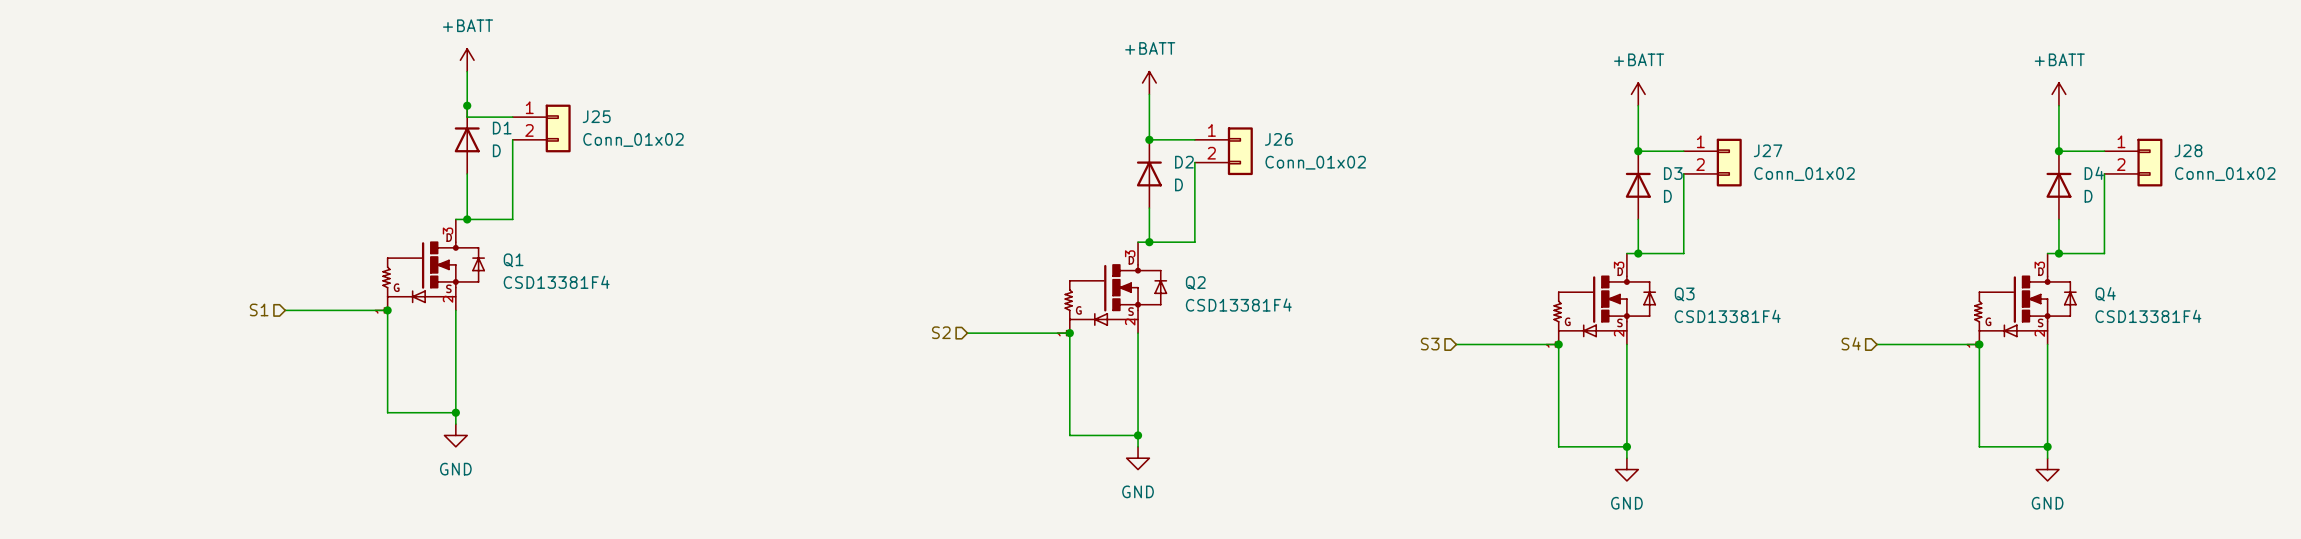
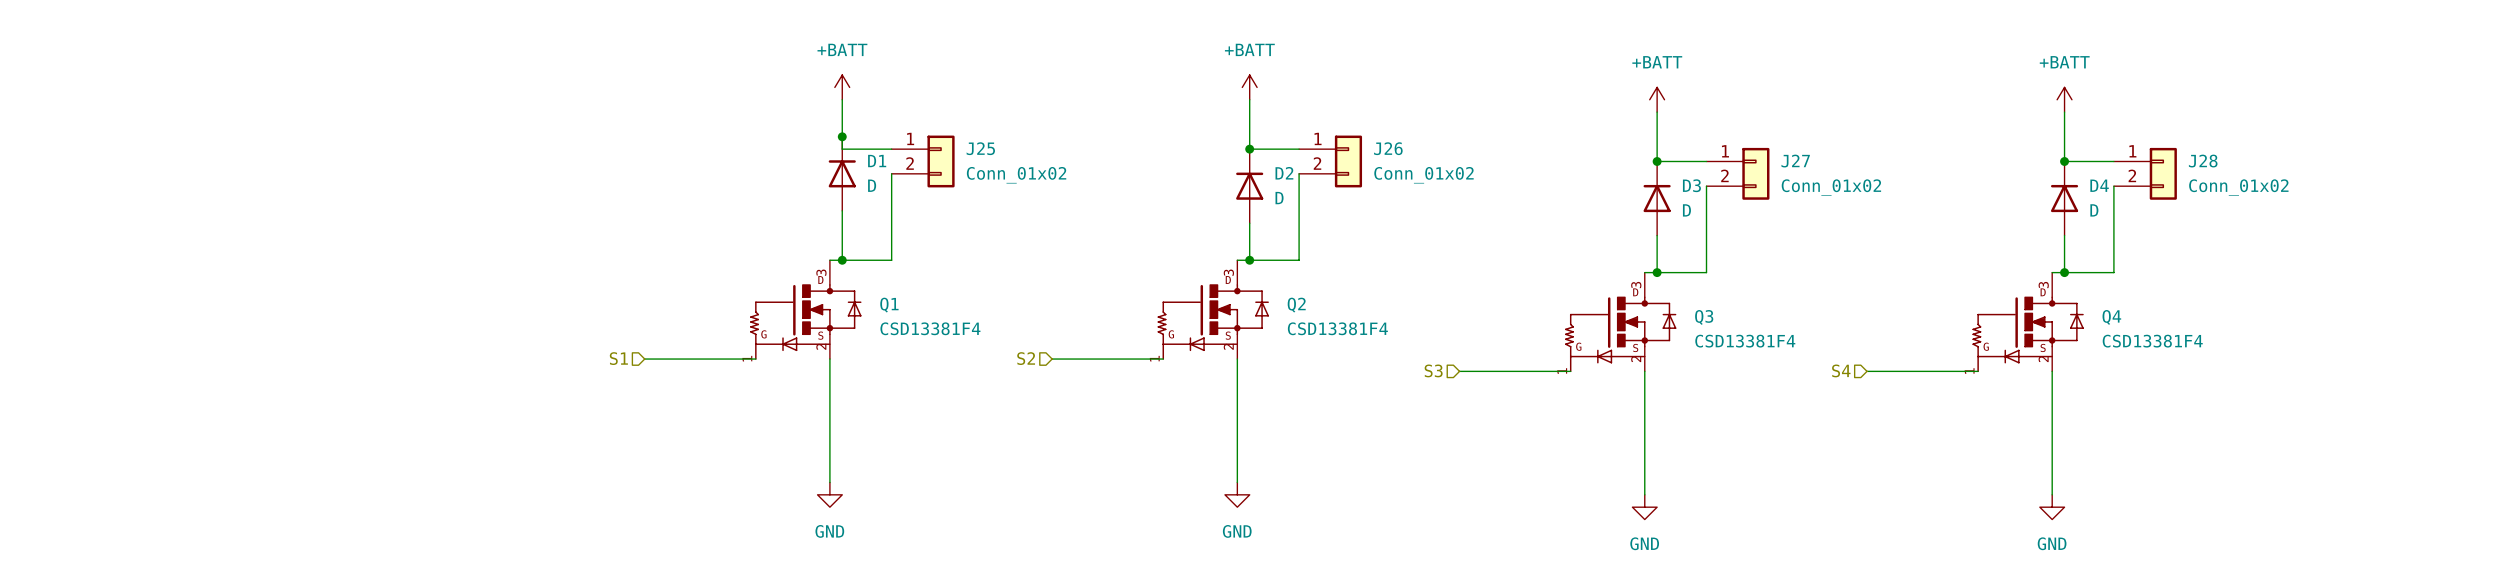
power symbol: +BATT (467, 60) -> none
wire: (467, 71) (467, 117) (512, 117) -> none
power symbol: none -> +BATT (842, 87)
wire: none -> (842, 99) (842, 149) (891, 149)
power symbol position: +BATT (1638, 94) -> +BATT (1657, 99)
power symbol: none -> +BATT (2064, 99)
power symbol: +BATT (2058, 94) -> none
junction: (467, 105) -> none
wire: (1638, 105) (1638, 151) (1683, 151) -> (1657, 112) (1657, 161) (1706, 161)
wire: (2058, 105) (2058, 151) (2104, 151) -> (2064, 112) (2064, 161) (2113, 161)
J25 position: (541, 128) -> (923, 161)
junction: none -> (842, 136)
D1 position: (467, 139) -> (842, 173)
wire: (512, 139) (512, 219) (455, 219) -> none
junction: none -> (1657, 161)
junction: (1638, 151) -> none
junction: none -> (2064, 161)
junction: (2058, 151) -> none
wire: none -> (891, 173) (891, 260) (829, 260)
J27 position: (1712, 162) -> (1737, 173)
J28 position: (2133, 162) -> (2145, 173)
wire: (467, 173) (467, 219) -> none
wire: (1683, 173) (1683, 253) (1626, 253) -> (1706, 186) (1706, 272) (1644, 272)
wire: (2104, 173) (2104, 253) (2047, 253) -> (2113, 186) (2113, 272) (2052, 272)
D3 position: (1638, 185) -> (1657, 198)
D4 position: (2058, 185) -> (2064, 198)
wire: none -> (842, 210) (842, 260)
junction: (467, 219) -> none
wire: (1638, 219) (1638, 253) -> (1657, 235) (1657, 272)
wire: (2058, 219) (2058, 253) -> (2064, 235) (2064, 272)
junction: none -> (842, 260)
junction: none -> (1657, 272)
junction: (1638, 253) -> none
junction: none -> (2064, 272)
junction: (2058, 253) -> none
Q1 position: (433, 265) -> (805, 310)
Q3 position: (1604, 299) -> (1620, 322)
Q4 position: (2025, 299) -> (2028, 322)
hierarchical label: S1 (259, 309) -> none
wire: (285, 310) (387, 310) (387, 412) (455, 412) -> none
junction: (387, 310) -> none
wire: (455, 310) (455, 424) -> none
hierarchical label: none -> S1 (618, 358)
wire: none -> (644, 359) (755, 359)
wire: none -> (829, 359) (829, 482)
wire: (1069, 333) (1069, 435) (1138, 435) -> none
junction: (1069, 333) -> none
hierarchical label position: S4 (1851, 343) -> S4 (1841, 370)
wire: none -> (1459, 371) (1570, 371)
hierarchical label position: S3 (1430, 344) -> S3 (1433, 370)
wire: (1456, 344) (1558, 344) (1558, 446) (1626, 446) -> none
junction: (1558, 344) -> none
wire: (1626, 344) (1626, 458) -> (1644, 371) (1644, 494)
wire: none -> (1867, 371) (1978, 371)
wire: (1877, 344) (1979, 344) (1979, 446) (2047, 446) -> none
junction: (1979, 344) -> none
wire: (2047, 344) (2047, 458) -> (2052, 371) (2052, 494)
junction: (455, 412) -> none
power symbol: GND (455, 435) -> none
junction: (1138, 435) -> none
junction: (1626, 446) -> none
junction: (2047, 446) -> none
power symbol: none -> GND (829, 494)
power symbol position: GND (1626, 469) -> GND (1644, 507)
power symbol: none -> GND (2052, 507)
power symbol: GND (2047, 469) -> none

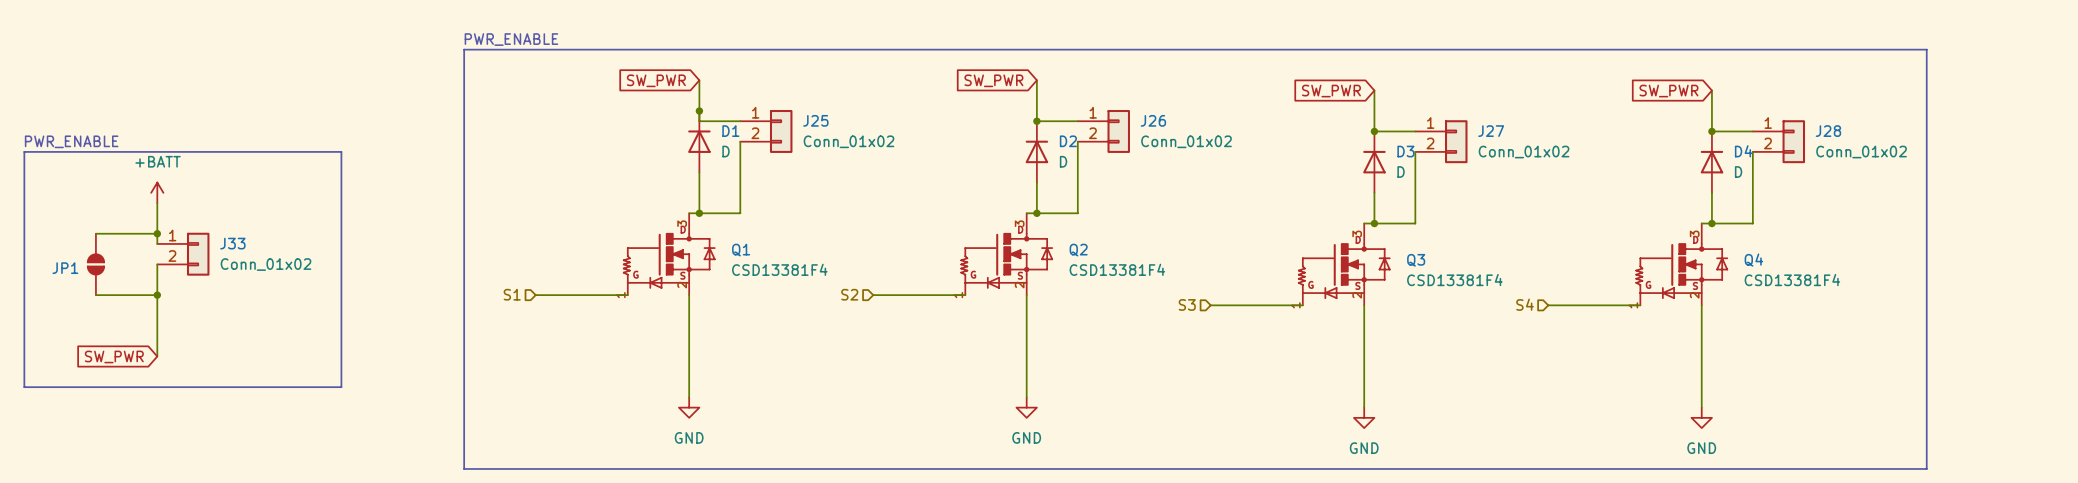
text: none -> PWR_ENABLE (511, 39)
line: none -> (464, 49) (1926, 49) (1926, 468) (464, 468) (464, 49)
power symbol: +BATT (842, 87) -> none
power symbol: +BATT (1249, 87) -> none
power symbol: +BATT (1657, 99) -> none
power symbol: +BATT (2064, 99) -> none
global label: none -> SW_PWR (656, 80)
global label: none -> SW_PWR (993, 80)
global label: none -> SW_PWR (1331, 91)
global label: none -> SW_PWR (1668, 91)
text: none -> PWR_ENABLE (71, 141)
line: none -> (24, 151) (341, 151) (341, 387) (24, 387) (24, 151)
power symbol: none -> +BATT (157, 192)
wire: none -> (157, 203) (157, 243)
wire: none -> (95, 233) (157, 233)
junction: none -> (157, 233)
J33: none -> Conn_01x02 (183, 254)
JP1: none -> (95, 264)
wire: none -> (157, 264) (157, 356)
wire: none -> (95, 295) (157, 295)
junction: none -> (157, 295)
global label: none -> SW_PWR (114, 356)

